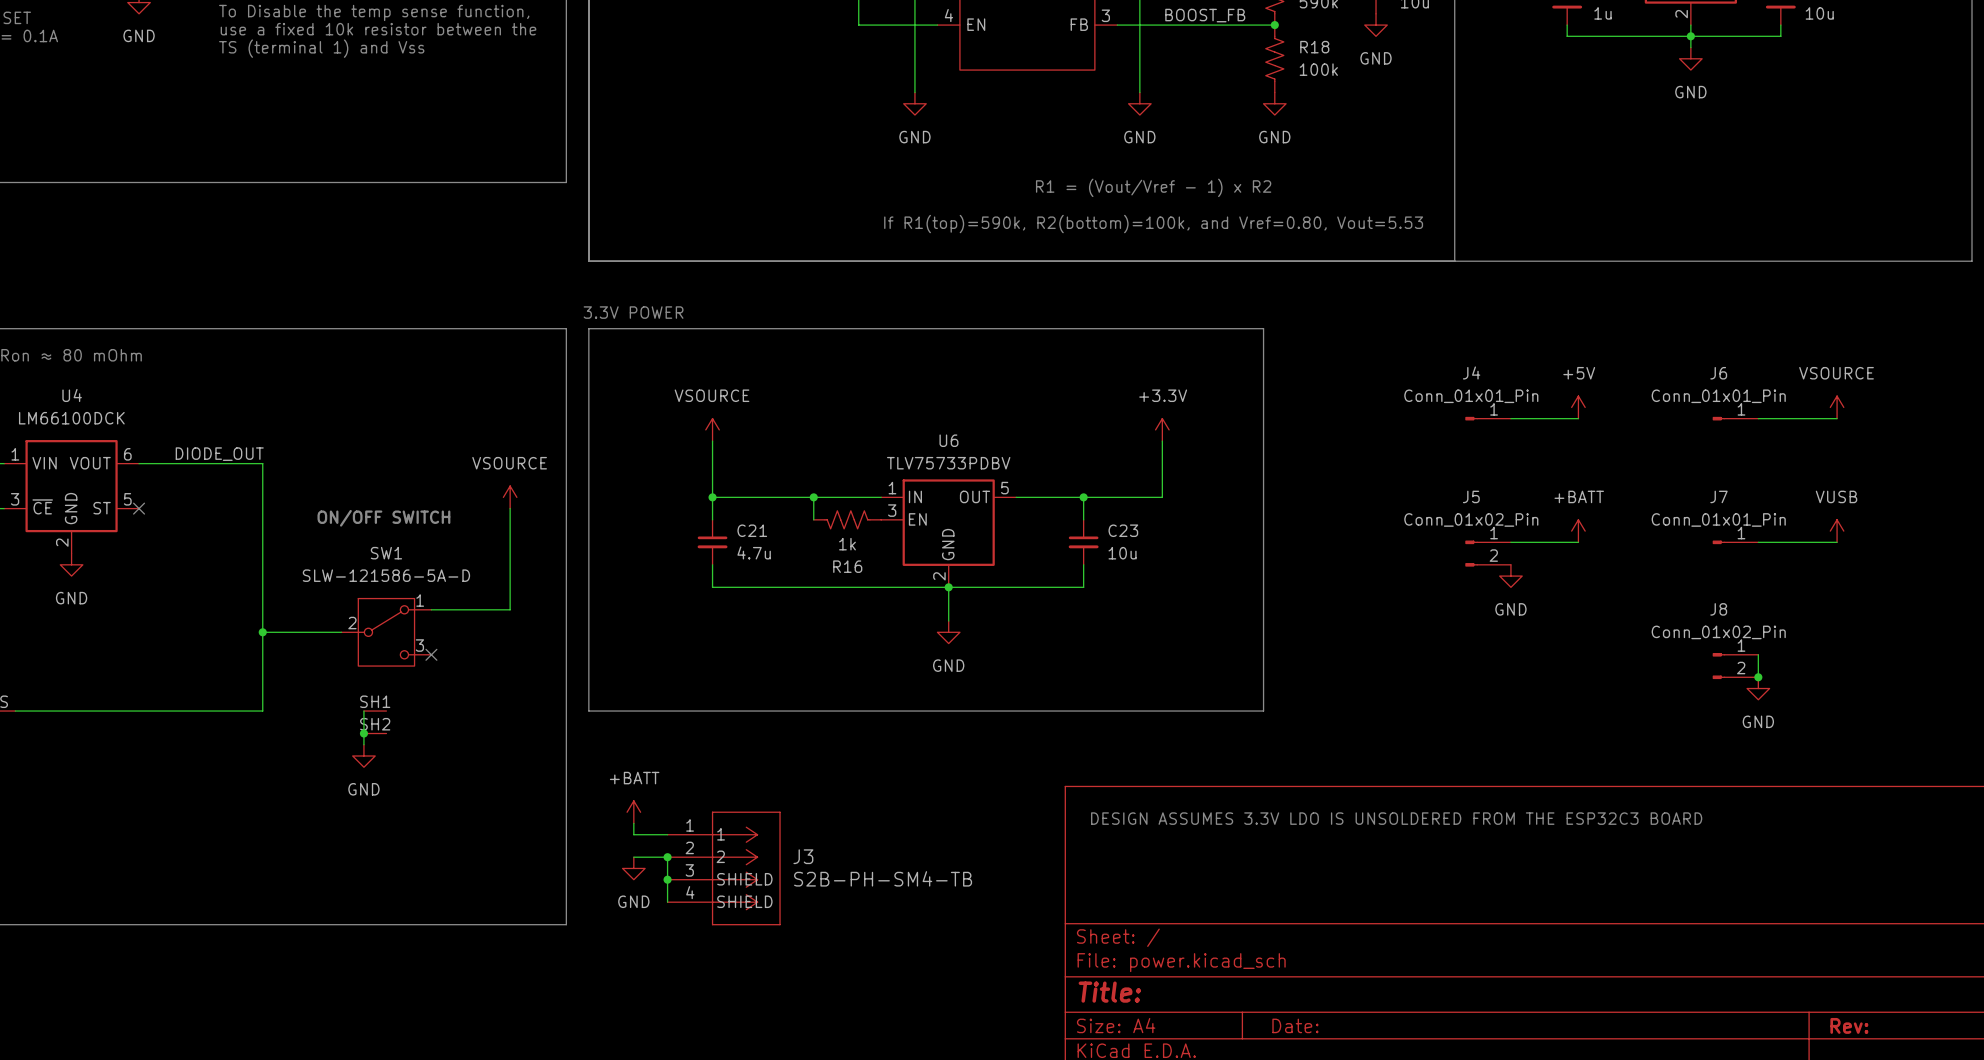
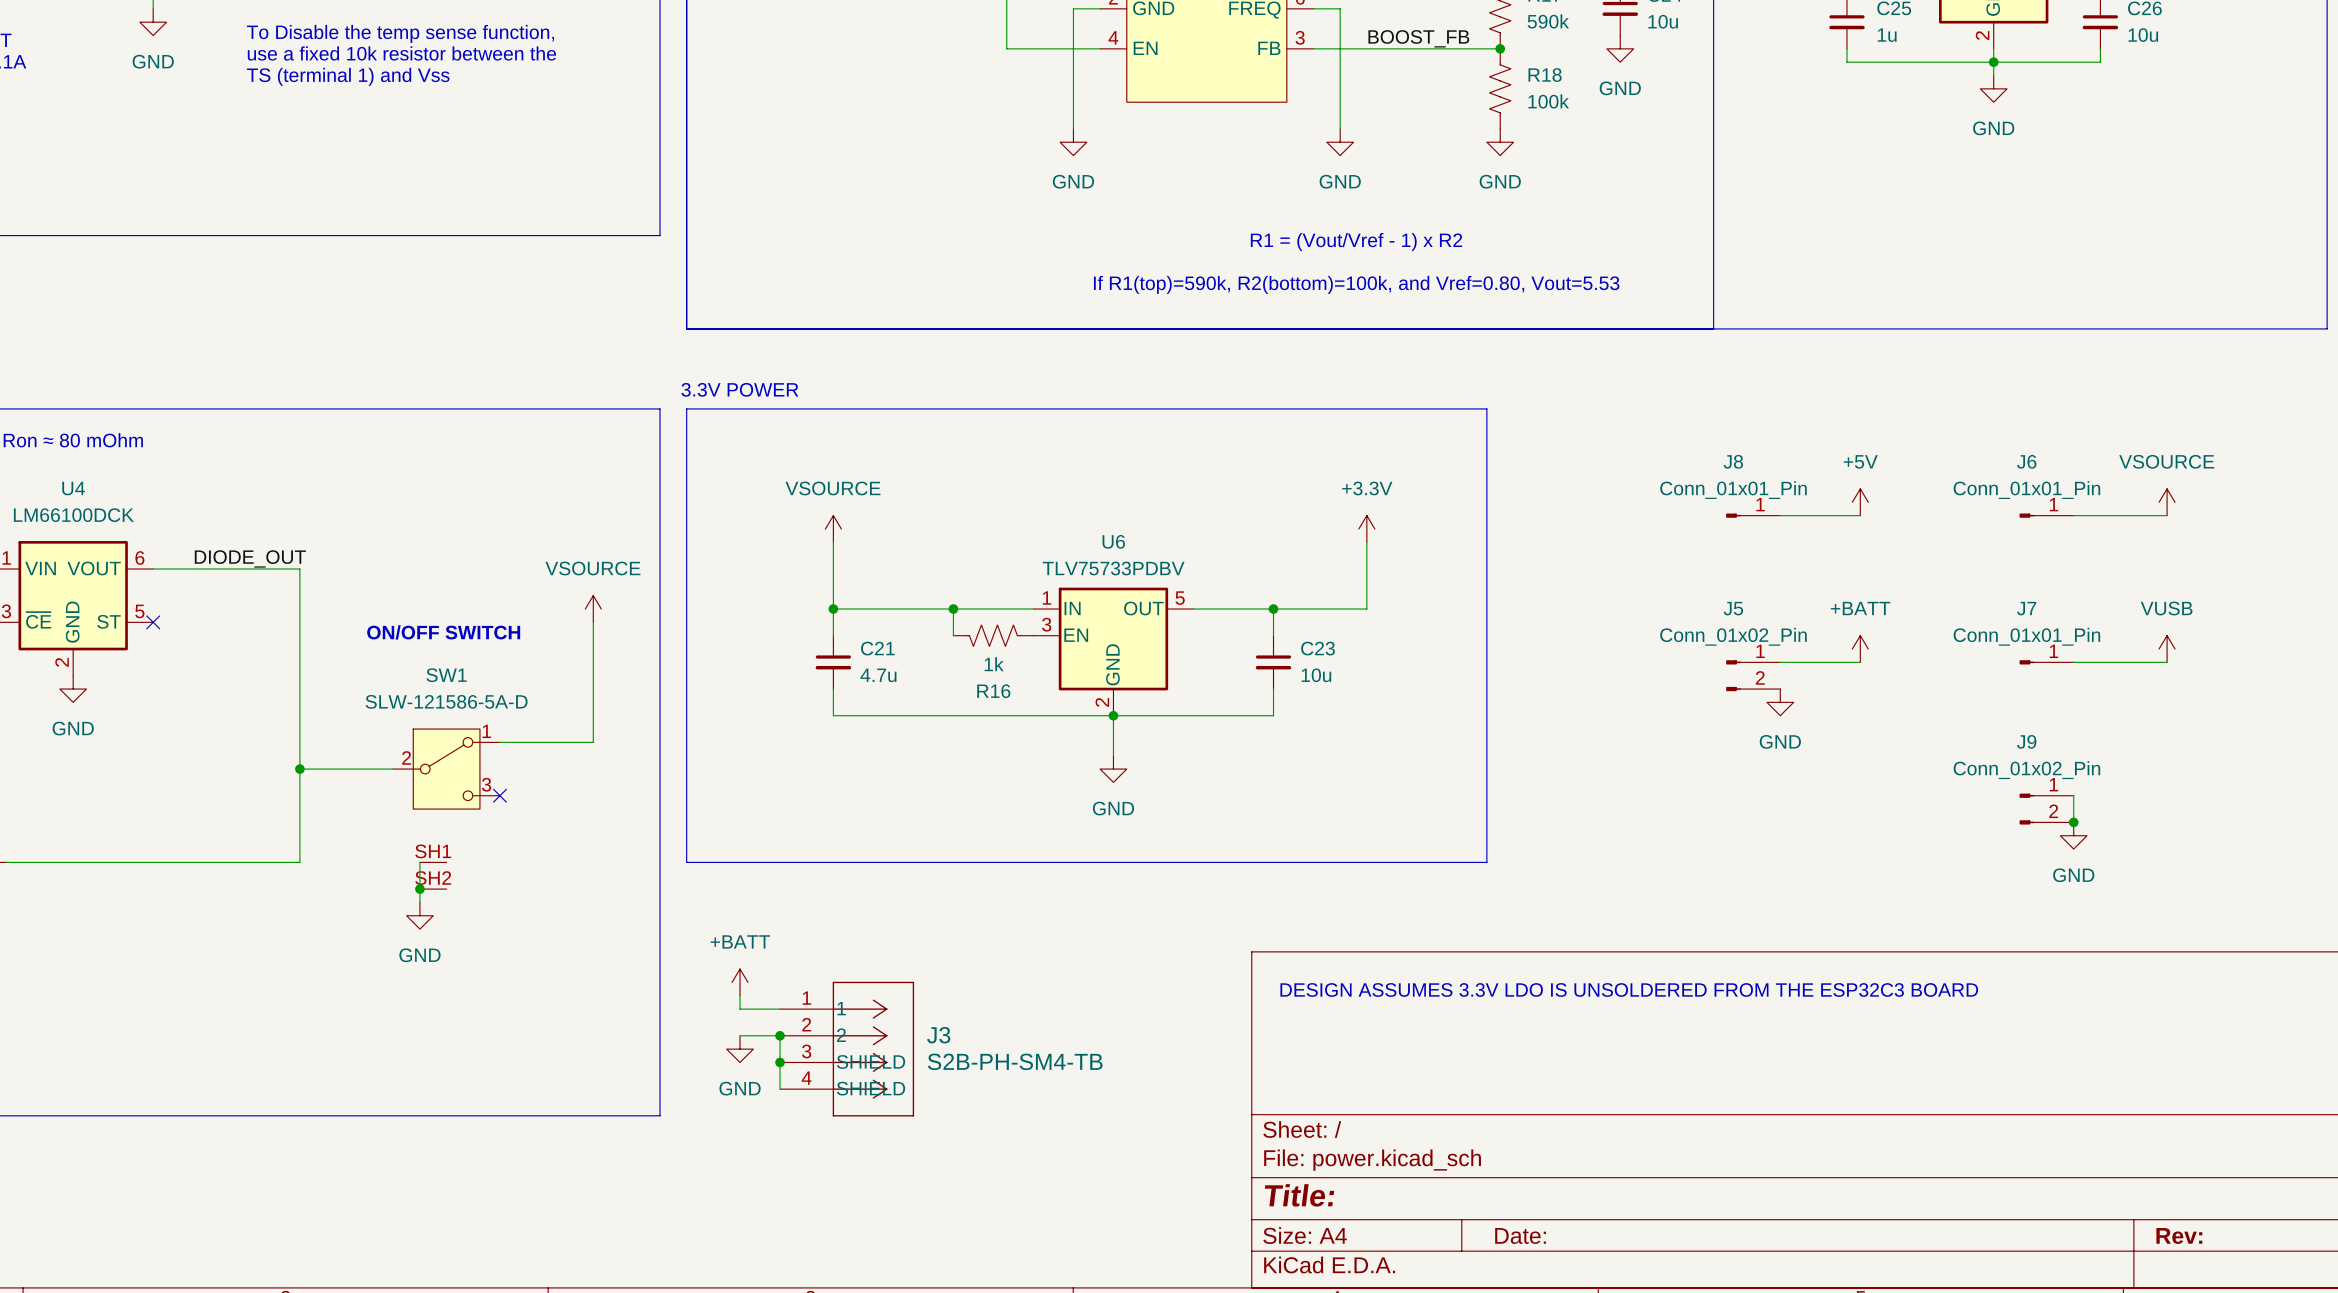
J4 name: J4 (1471, 372) -> J8 (1733, 461)
J8 name: J8 (1718, 609) -> J9 (2026, 741)

